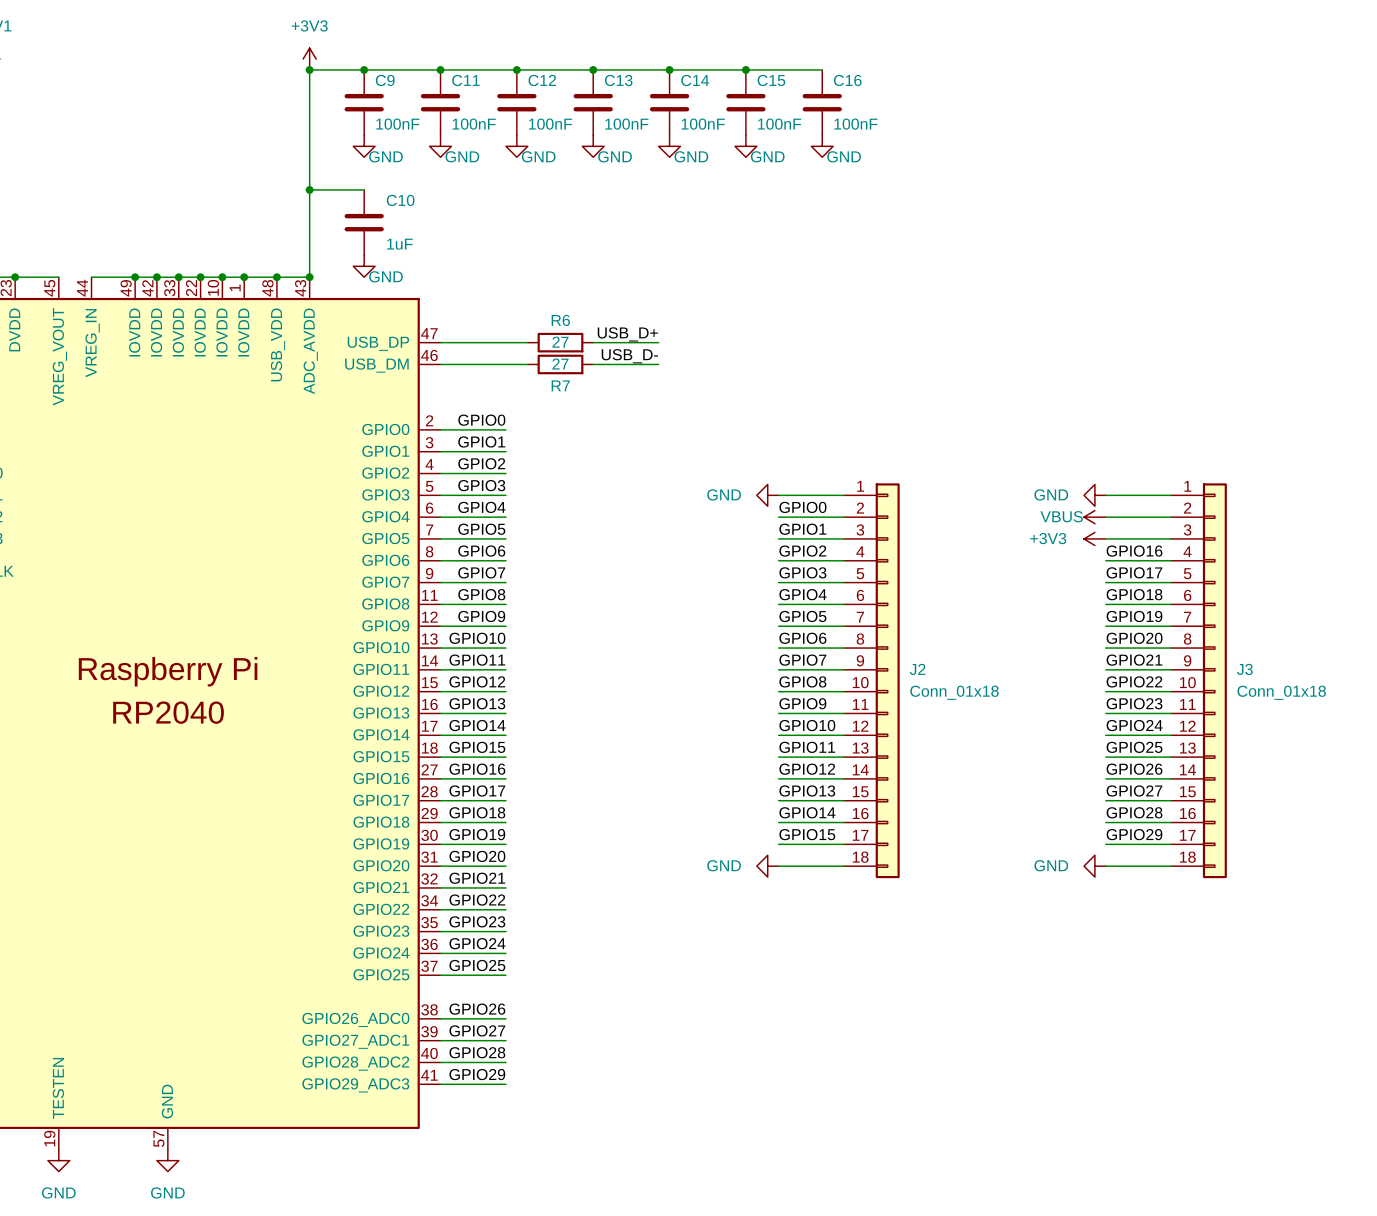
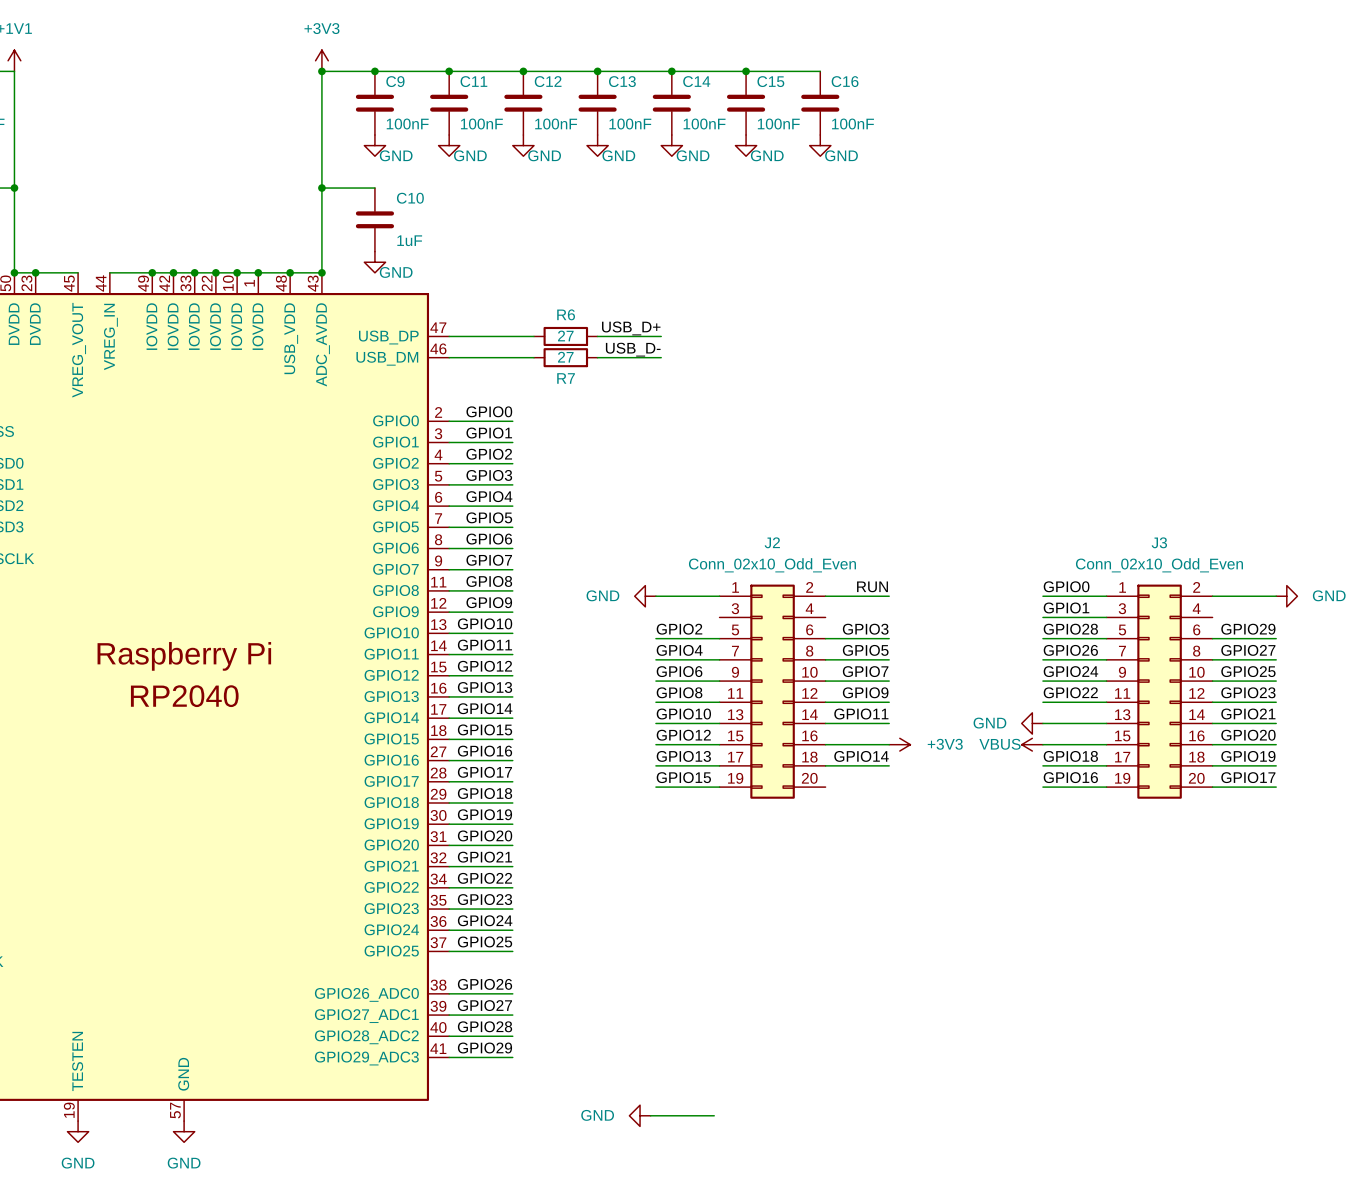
J2 symbol: [844, 483, 900, 879] -> [719, 584, 826, 799]
J3 symbol: [1171, 483, 1227, 879] -> [1106, 584, 1213, 799]
power symbol: GND (767, 495) -> none
wire: (778, 495) (844, 495) -> none
power symbol: GND (1094, 495) -> none
wire: (1105, 495) (1171, 495) -> none
label: GPIO0 (802, 507) -> none
wire: (778, 517) (844, 517) -> (825, 702) (889, 702)
power symbol: VBUS (1094, 517) -> none
wire: (1105, 517) (1171, 517) -> none
label: GPIO1 (802, 529) -> none
wire: (778, 538) (844, 538) -> (825, 681) (889, 681)
power symbol: +3V3 (1094, 538) -> none
wire: (1105, 538) (1171, 538) -> (1212, 659) (1276, 659)
label position: GPIO2 (802, 551) -> GPIO2 (679, 629)
label: GPIO16 (1134, 551) -> none
wire: (778, 560) (844, 560) -> (825, 659) (889, 659)
wire: (1105, 560) (1171, 560) -> (1212, 638) (1276, 638)
label position: GPIO3 (802, 572) -> GPIO3 (865, 629)
label: GPIO17 (1134, 572) -> none
wire: (778, 582) (844, 582) -> (825, 638) (889, 638)
wire: (1105, 582) (1171, 582) -> (1212, 596) (1276, 596)
label position: GPIO4 (803, 594) -> GPIO4 (679, 650)
label position: GPIO18 (1134, 594) -> GPIO18 (1070, 756)
label: none -> RUN (872, 586)
label: none -> GPIO0 (1066, 586)
wire: (778, 604) (844, 604) -> (655, 596) (719, 596)
wire: (1105, 604) (1171, 604) -> (1042, 596) (1106, 596)
power symbol: none -> GND (645, 596)
power symbol: none -> GND (1286, 596)
label position: GPIO5 (802, 616) -> GPIO5 (865, 650)
label: GPIO19 (1134, 616) -> none
label: none -> GPIO1 (1066, 607)
wire: (778, 626) (844, 626) -> (825, 596) (889, 596)
wire: (1105, 626) (1171, 626) -> (1042, 617) (1106, 617)
label position: GPIO6 (802, 638) -> GPIO6 (679, 671)
label: GPIO20 (1134, 638) -> none
label: none -> GPIO29 (1248, 629)
wire: (778, 648) (844, 648) -> (655, 638) (719, 638)
wire: (1105, 648) (1171, 648) -> (1042, 638) (1106, 638)
label position: GPIO7 (802, 660) -> GPIO7 (865, 671)
label position: GPIO21 (1134, 660) -> GPIO21 (1248, 714)
label: none -> GPIO27 (1248, 650)
wire: (778, 669) (844, 669) -> (655, 659) (719, 659)
J2 name position: J2 (917, 669) -> J2 (772, 542)
wire: (1105, 669) (1171, 669) -> (1042, 659) (1106, 659)
J3 name position: J3 (1244, 669) -> J3 (1159, 542)
label position: GPIO8 (802, 681) -> GPIO8 (679, 692)
label position: GPIO22 (1134, 681) -> GPIO22 (1070, 692)
wire: (778, 691) (844, 691) -> (655, 681) (719, 681)
wire: (1105, 691) (1171, 691) -> (1042, 681) (1106, 681)
J2 value: Conn_01x18 (954, 692) -> Conn_02x10_Odd_Even (772, 565)
J3 value: Conn_01x18 (1281, 692) -> Conn_02x10_Odd_Even (1159, 565)
wire: none -> (1212, 681) (1276, 681)
label position: GPIO9 (802, 703) -> GPIO9 (865, 692)
label position: GPIO23 (1134, 703) -> GPIO23 (1248, 692)
wire: (778, 713) (844, 713) -> (655, 702) (719, 702)
wire: (1105, 713) (1171, 713) -> (1042, 702) (1106, 702)
wire: none -> (1212, 702) (1276, 702)
label position: GPIO10 (807, 725) -> GPIO10 (683, 714)
label position: GPIO24 (1134, 725) -> GPIO24 (1070, 671)
wire: (778, 735) (844, 735) -> (655, 723) (719, 723)
wire: (1105, 735) (1171, 735) -> (1042, 723) (1106, 723)
power symbol: none -> GND (1032, 723)
wire: none -> (1212, 723) (1276, 723)
label position: GPIO11 (807, 747) -> GPIO11 (861, 714)
label position: GPIO25 (1134, 747) -> GPIO25 (1248, 671)
label: none -> GPIO20 (1248, 735)
wire: (778, 757) (844, 757) -> (655, 744) (719, 744)
wire: (1105, 757) (1171, 757) -> (1042, 744) (1106, 744)
power symbol: none -> +3V3 (899, 744)
power symbol: none -> VBUS (1032, 744)
label position: GPIO12 (807, 769) -> GPIO12 (683, 735)
label position: GPIO26 (1134, 769) -> GPIO26 (1070, 650)
label: none -> GPIO19 (1248, 756)
wire: (778, 778) (844, 778) -> (655, 765) (719, 765)
wire: (1105, 778) (1171, 778) -> (1042, 765) (1106, 765)
label position: GPIO13 (807, 790) -> GPIO13 (683, 756)
label: GPIO27 (1134, 790) -> GPIO16 (1070, 777)
label: none -> GPIO17 (1248, 777)
wire: (778, 800) (844, 800) -> (655, 787) (719, 787)
wire: (1105, 800) (1171, 800) -> (1042, 787) (1106, 787)
label position: GPIO14 (807, 812) -> GPIO14 (861, 756)
label position: GPIO28 (1134, 812) -> GPIO28 (1070, 629)
wire: (778, 822) (844, 822) -> (825, 765) (889, 765)
wire: (1105, 822) (1171, 822) -> (1212, 787) (1276, 787)
label position: GPIO15 (807, 834) -> GPIO15 (683, 777)
label: GPIO29 (1134, 834) -> none
wire: (778, 844) (844, 844) -> (825, 744) (889, 744)
wire: (1105, 844) (1171, 844) -> (1212, 765) (1276, 765)
power symbol: GND (767, 866) -> none
wire: (778, 866) (844, 866) -> (825, 723) (889, 723)
power symbol: GND (1094, 866) -> none
wire: (1105, 866) (1171, 866) -> (1212, 744) (1276, 744)
power symbol: none -> GND (640, 1115)
wire: none -> (650, 1115) (714, 1115)

